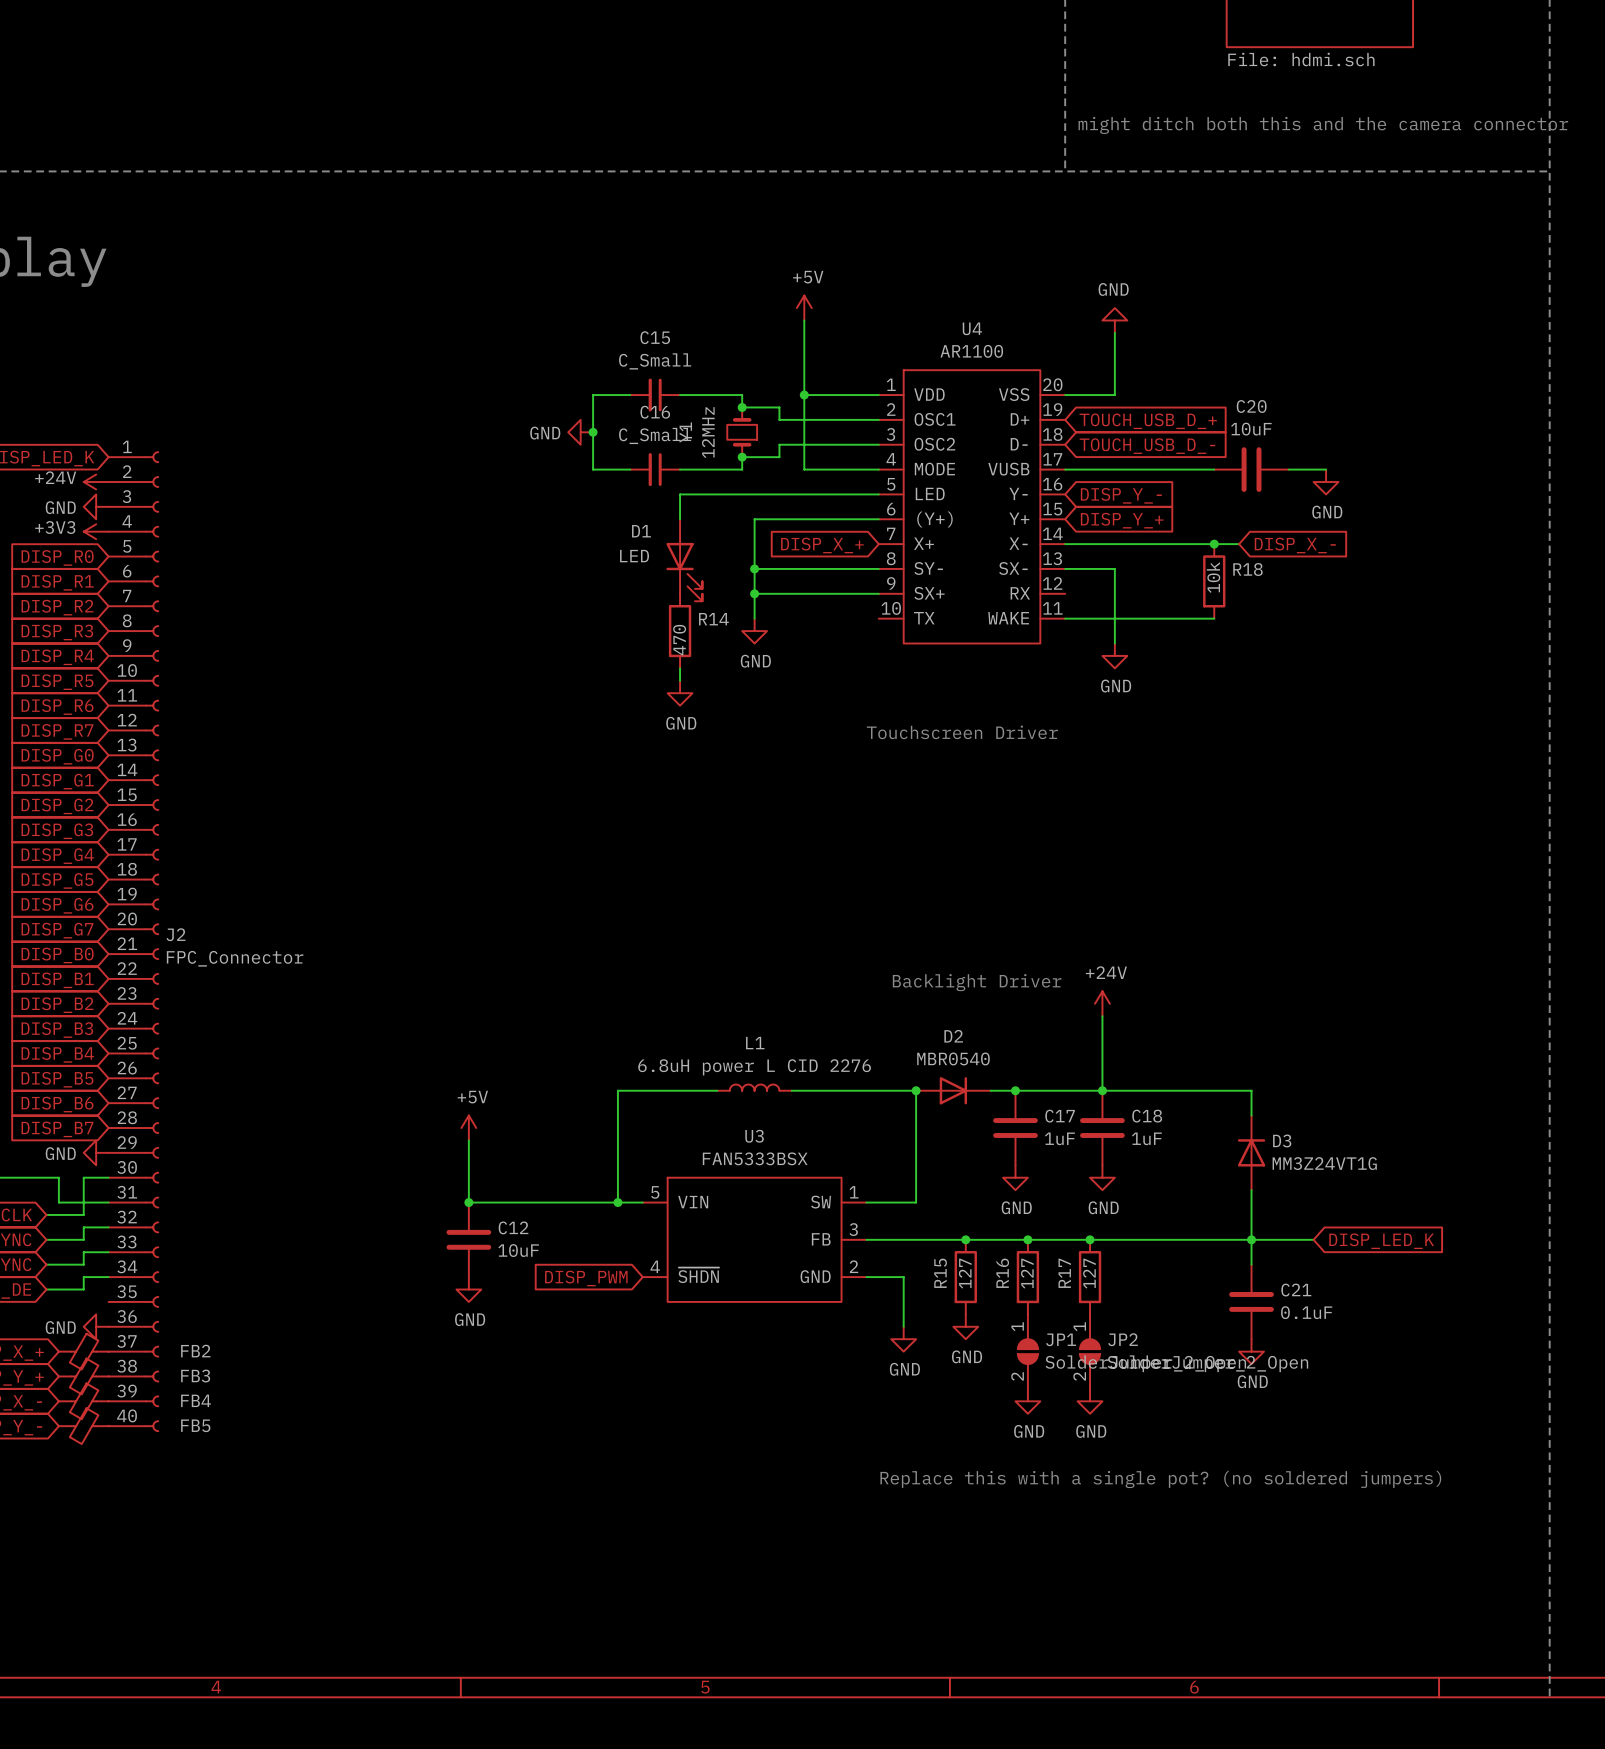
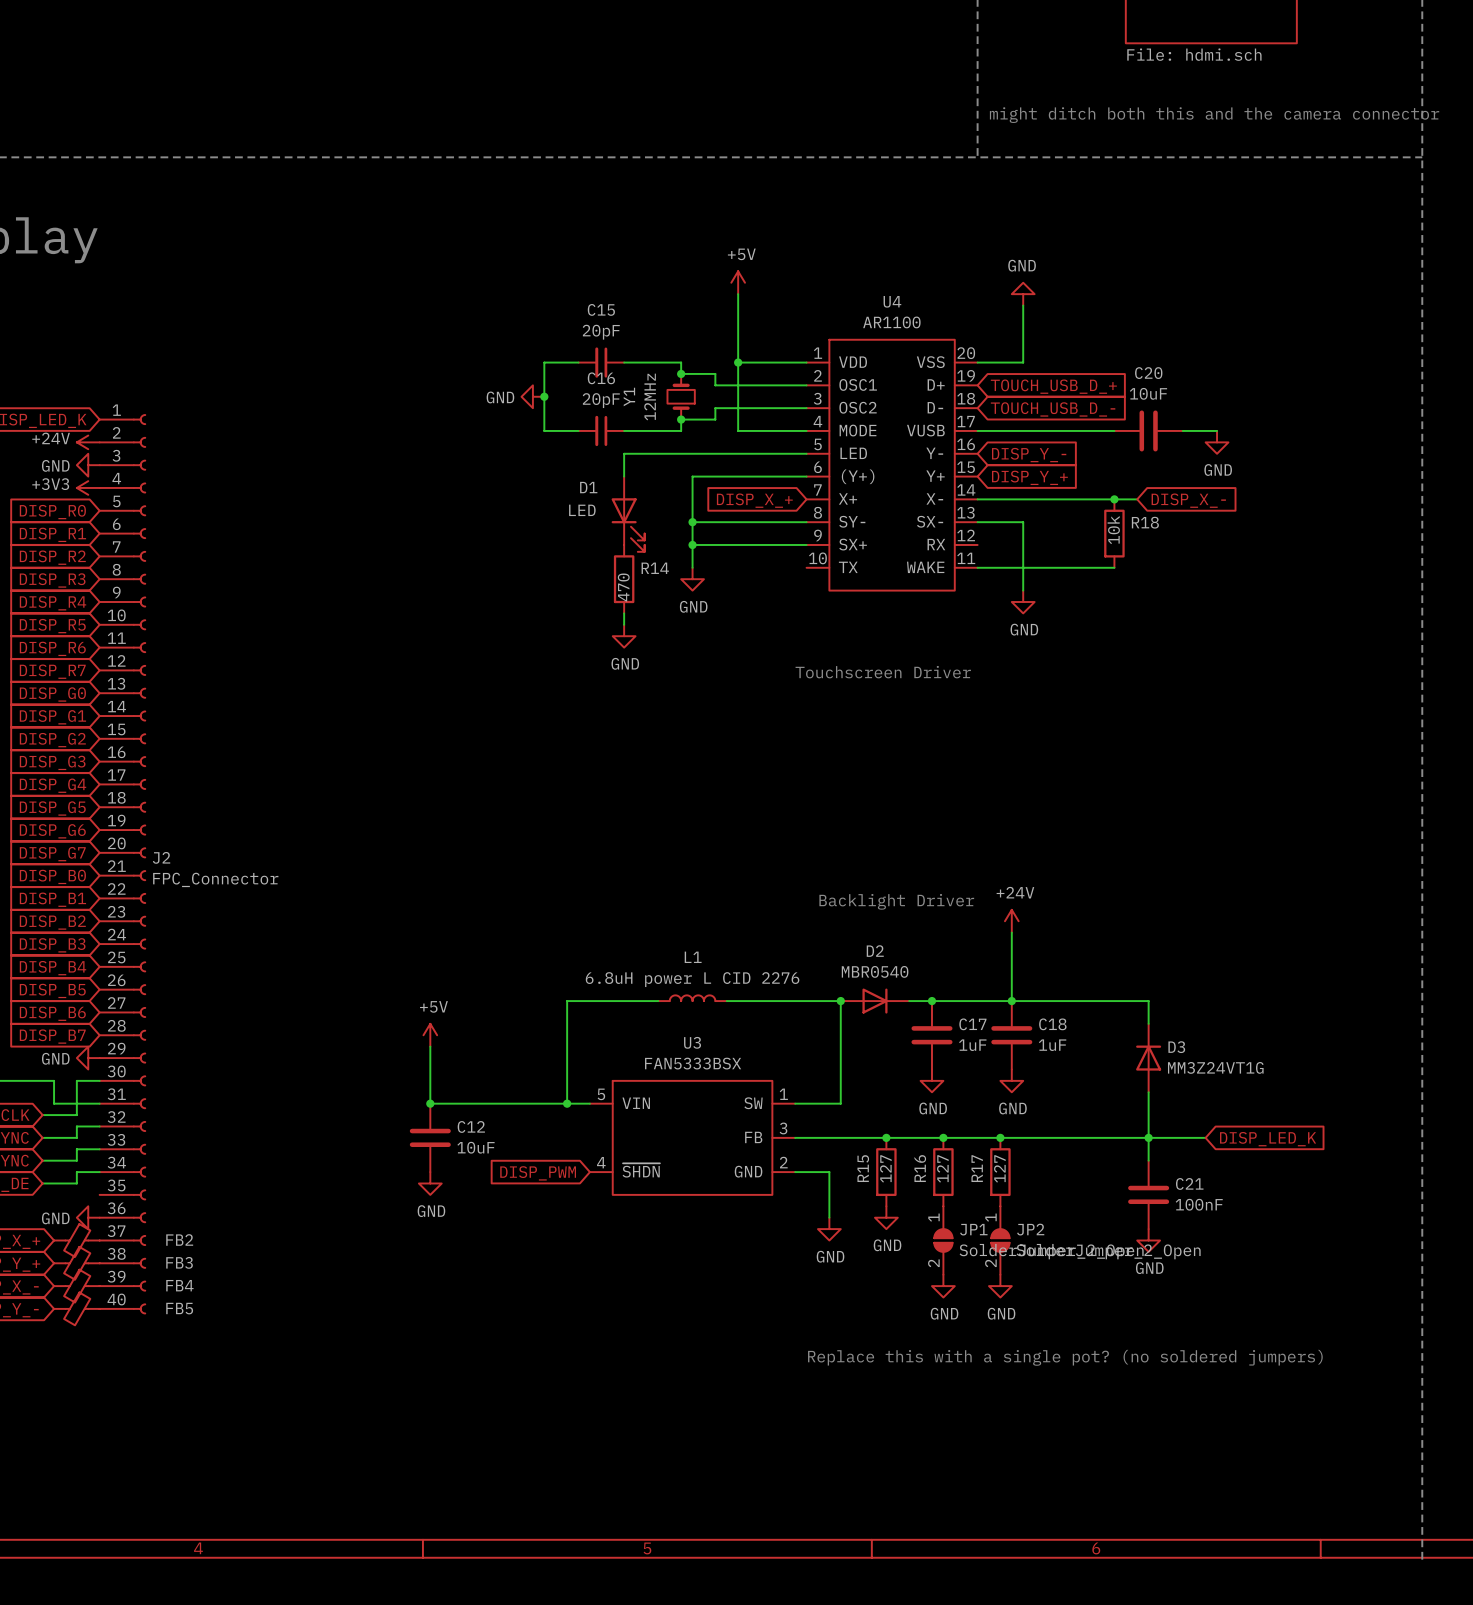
C15 value: C_Small (655, 361) -> 20pF (601, 332)
C16 value: C_Small (655, 435) -> 20pF (601, 400)
C21 value: 0.1uF (1306, 1312) -> 100nF (1199, 1204)

